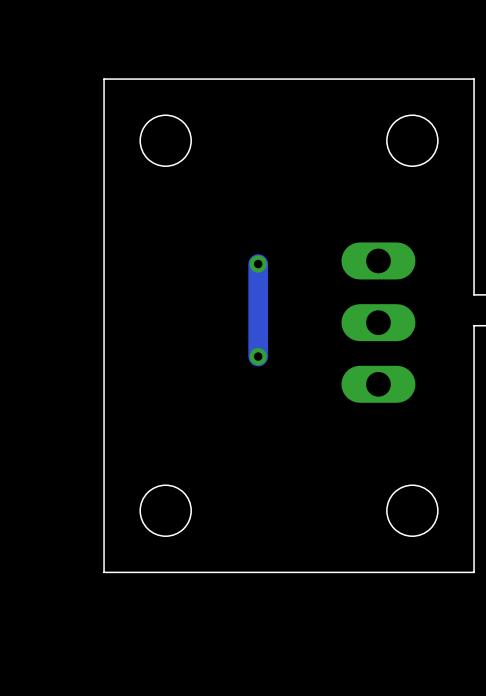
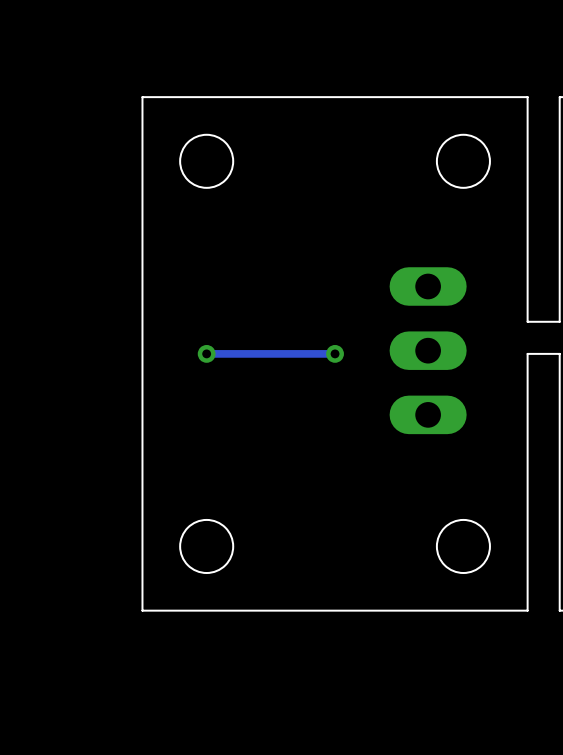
track: (258, 264) (258, 356) -> none
via: (258, 264) -> none
via: none -> (206, 353)
track: none -> (335, 353) (206, 353)
via: none -> (335, 353)
via: (258, 356) -> none

